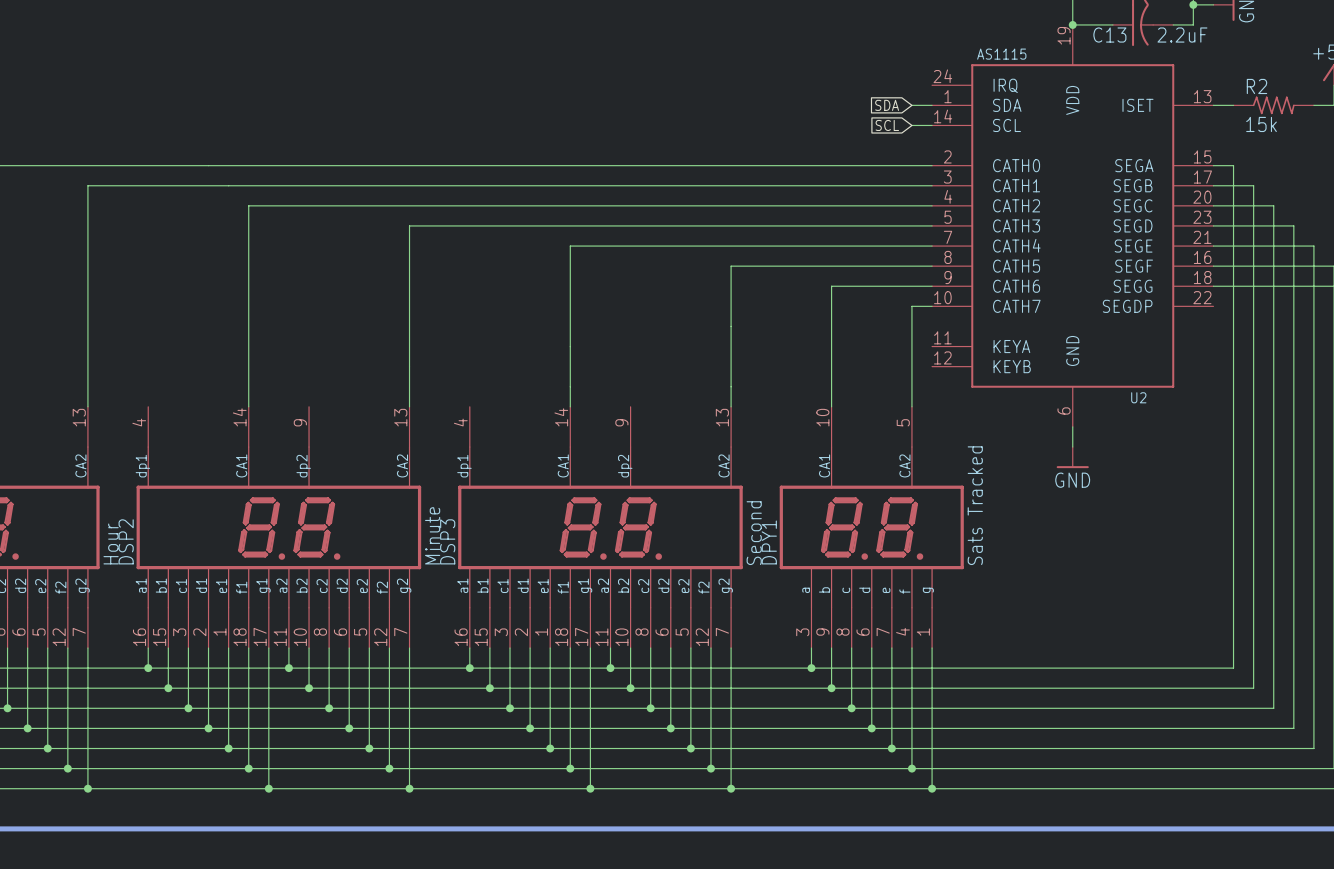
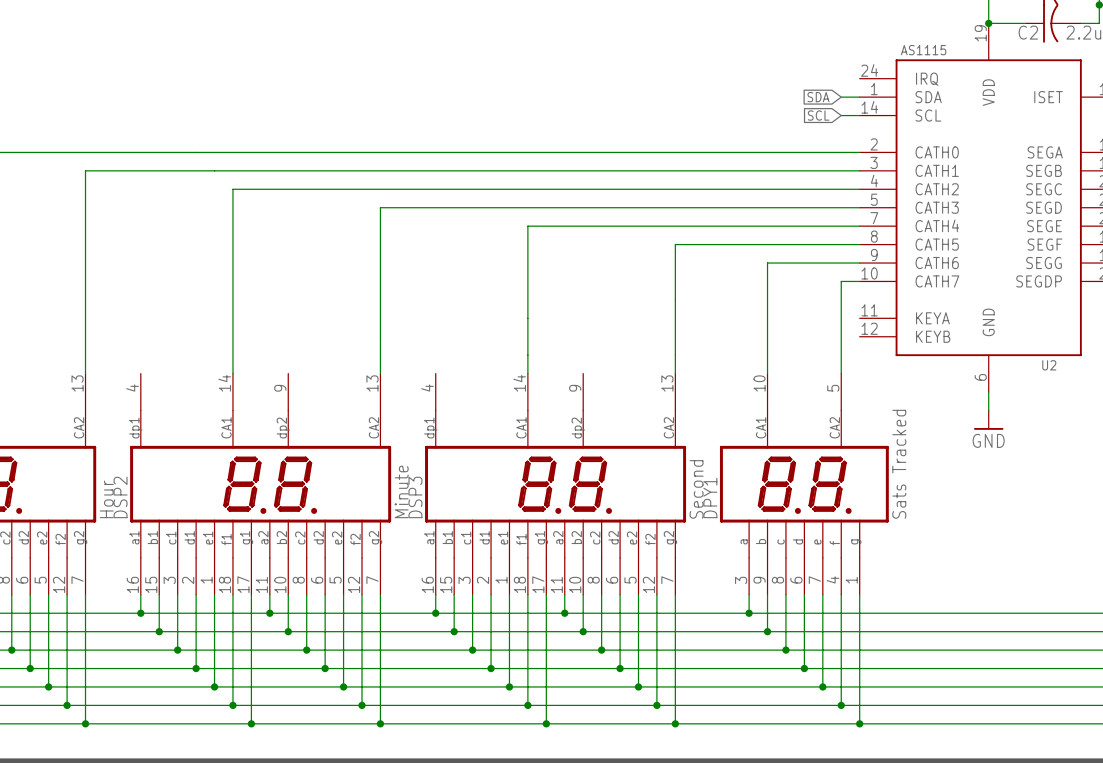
C13 name: C13 (1109, 35) -> C2 (1028, 32)

